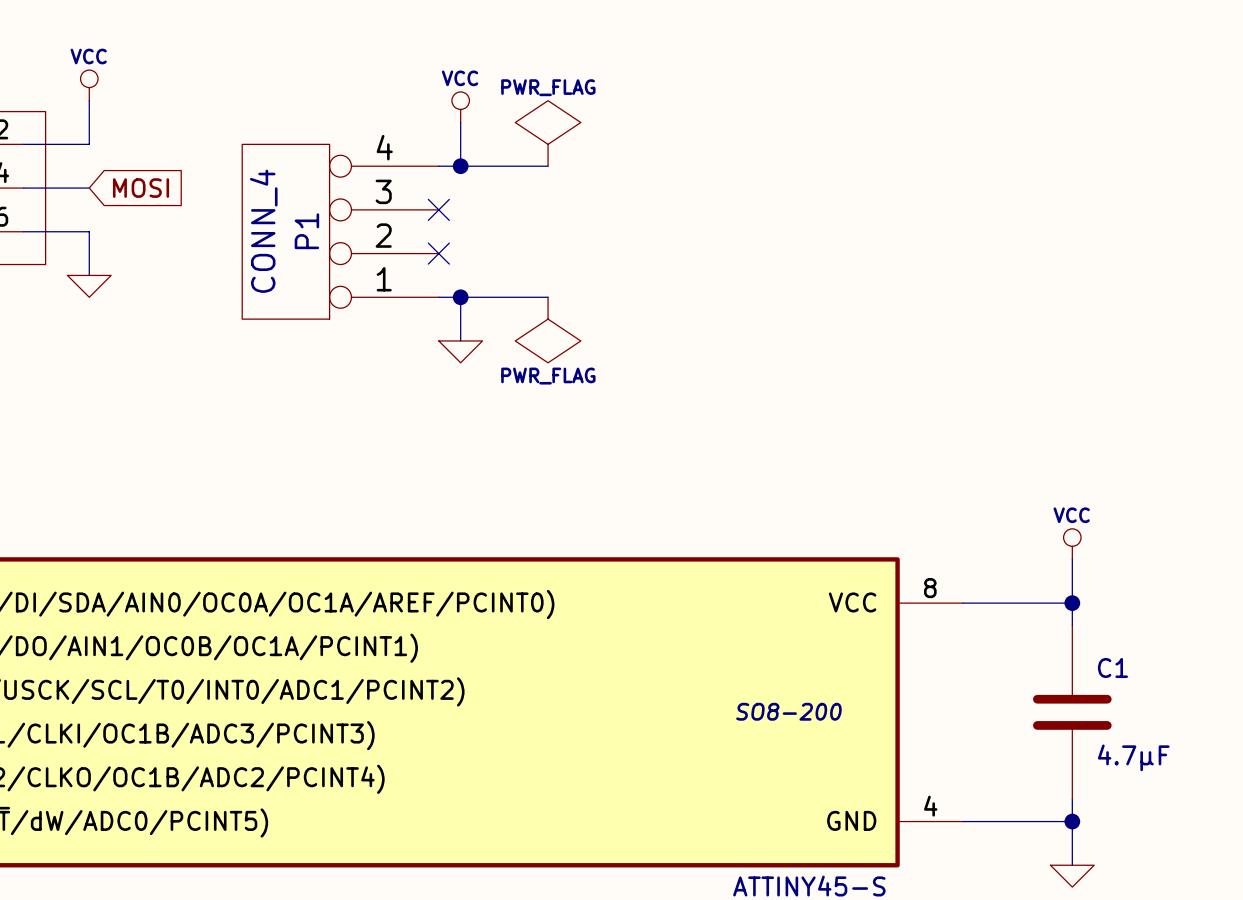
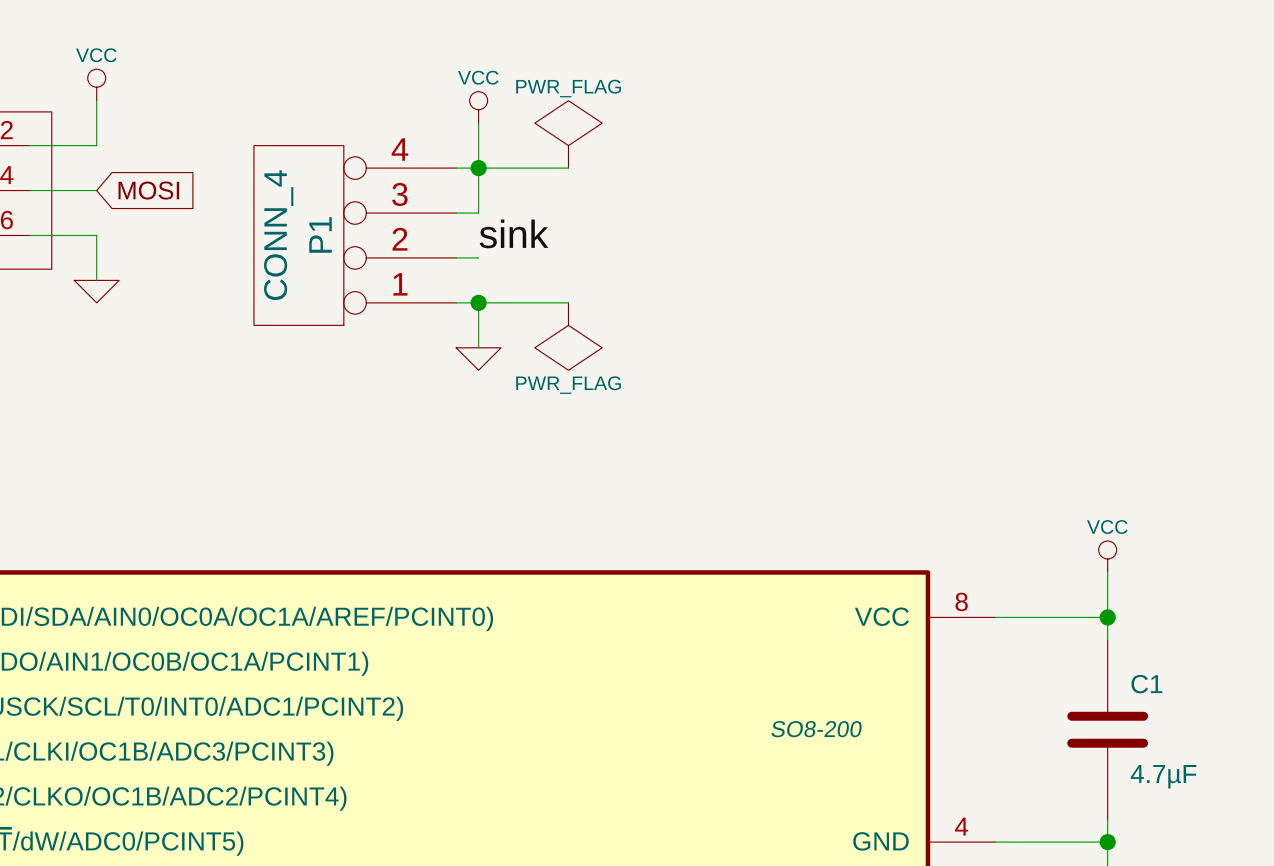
wire: none -> (478, 168) (478, 213) (456, 213)
no-connect mark: (438, 209) -> none
label: none -> sink (514, 233)
wire: none -> (456, 257) (478, 257)
no-connect mark: (438, 253) -> none

